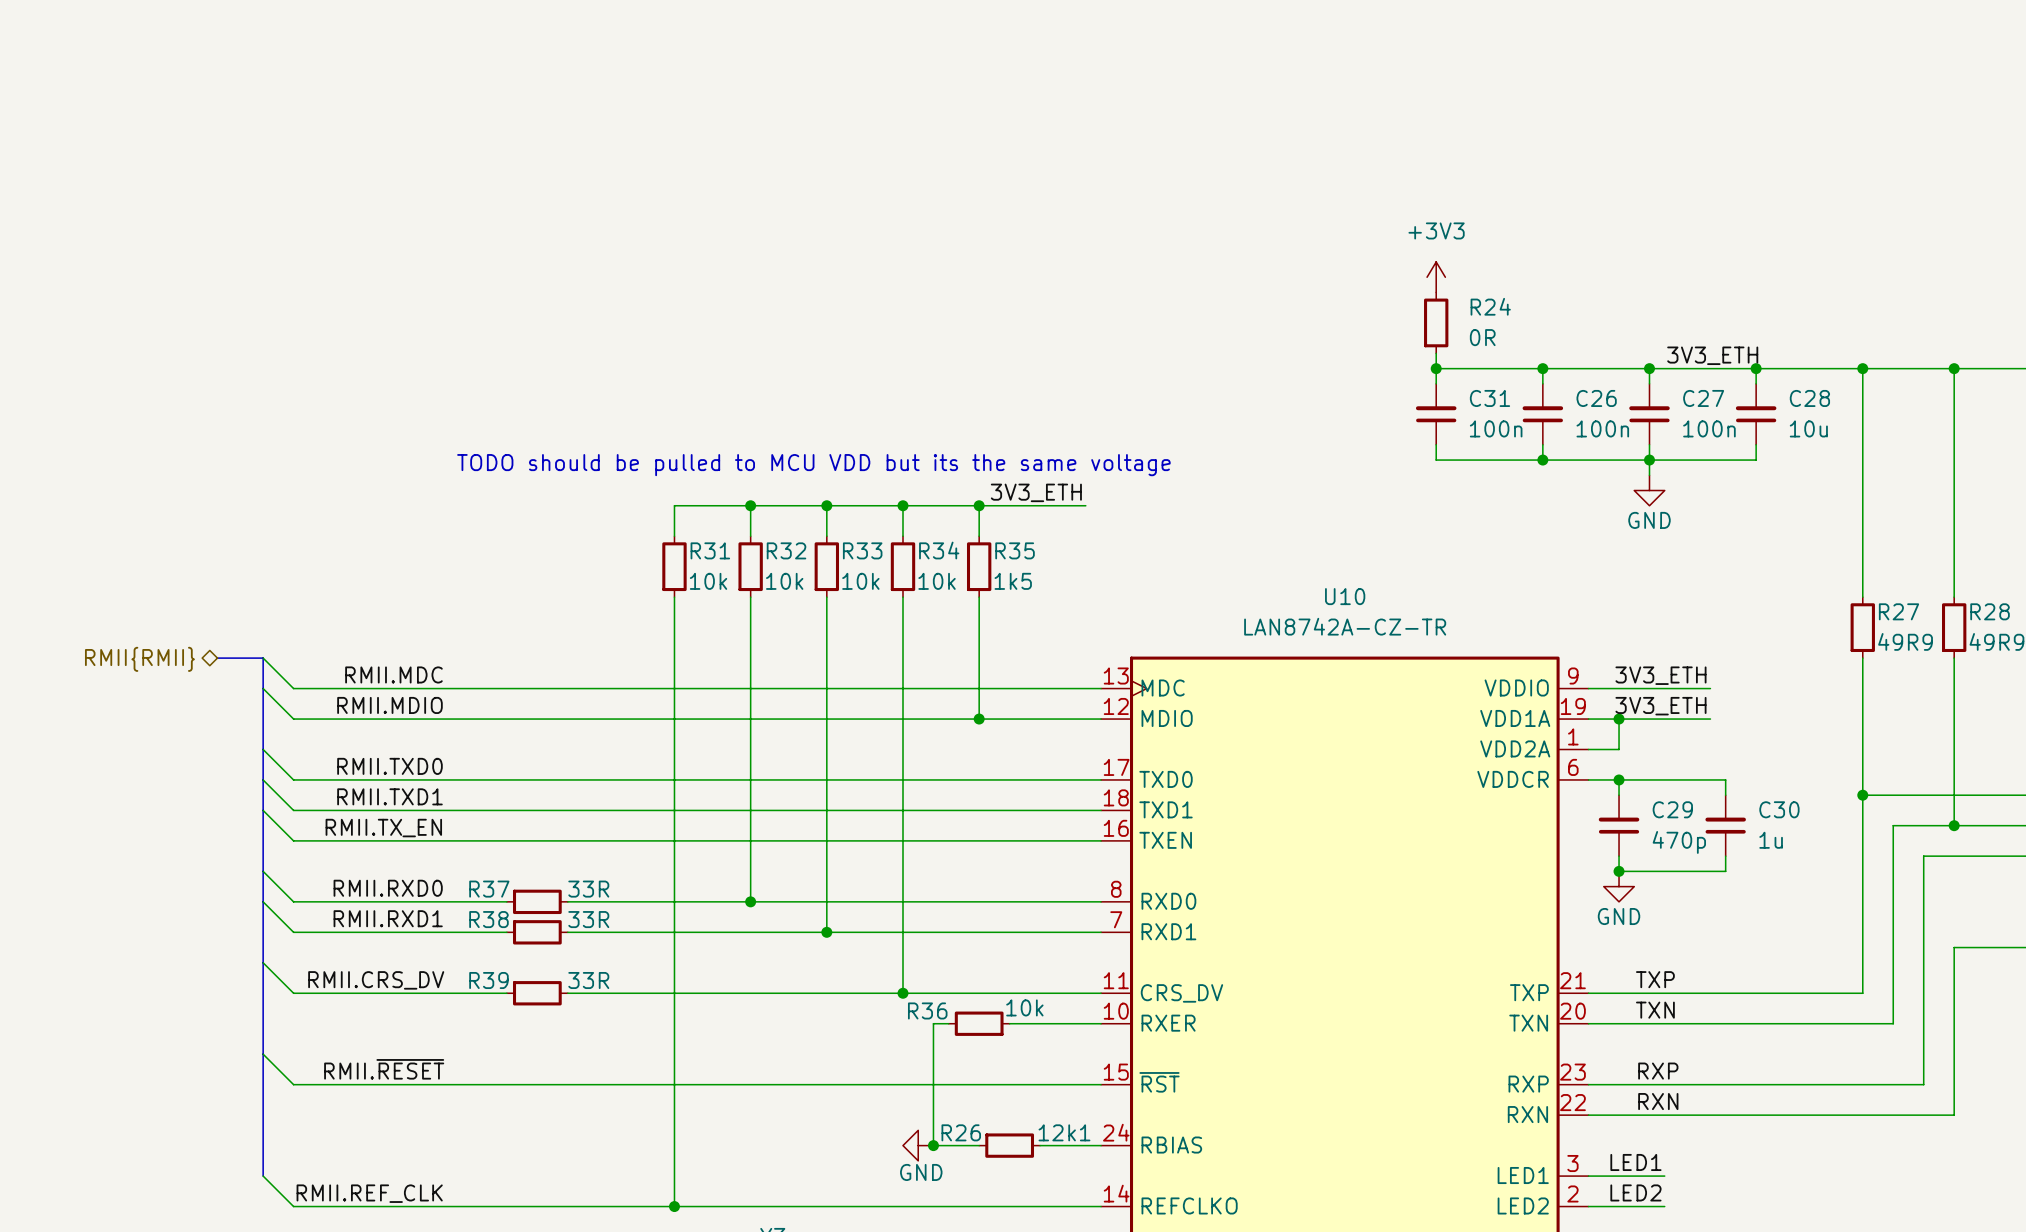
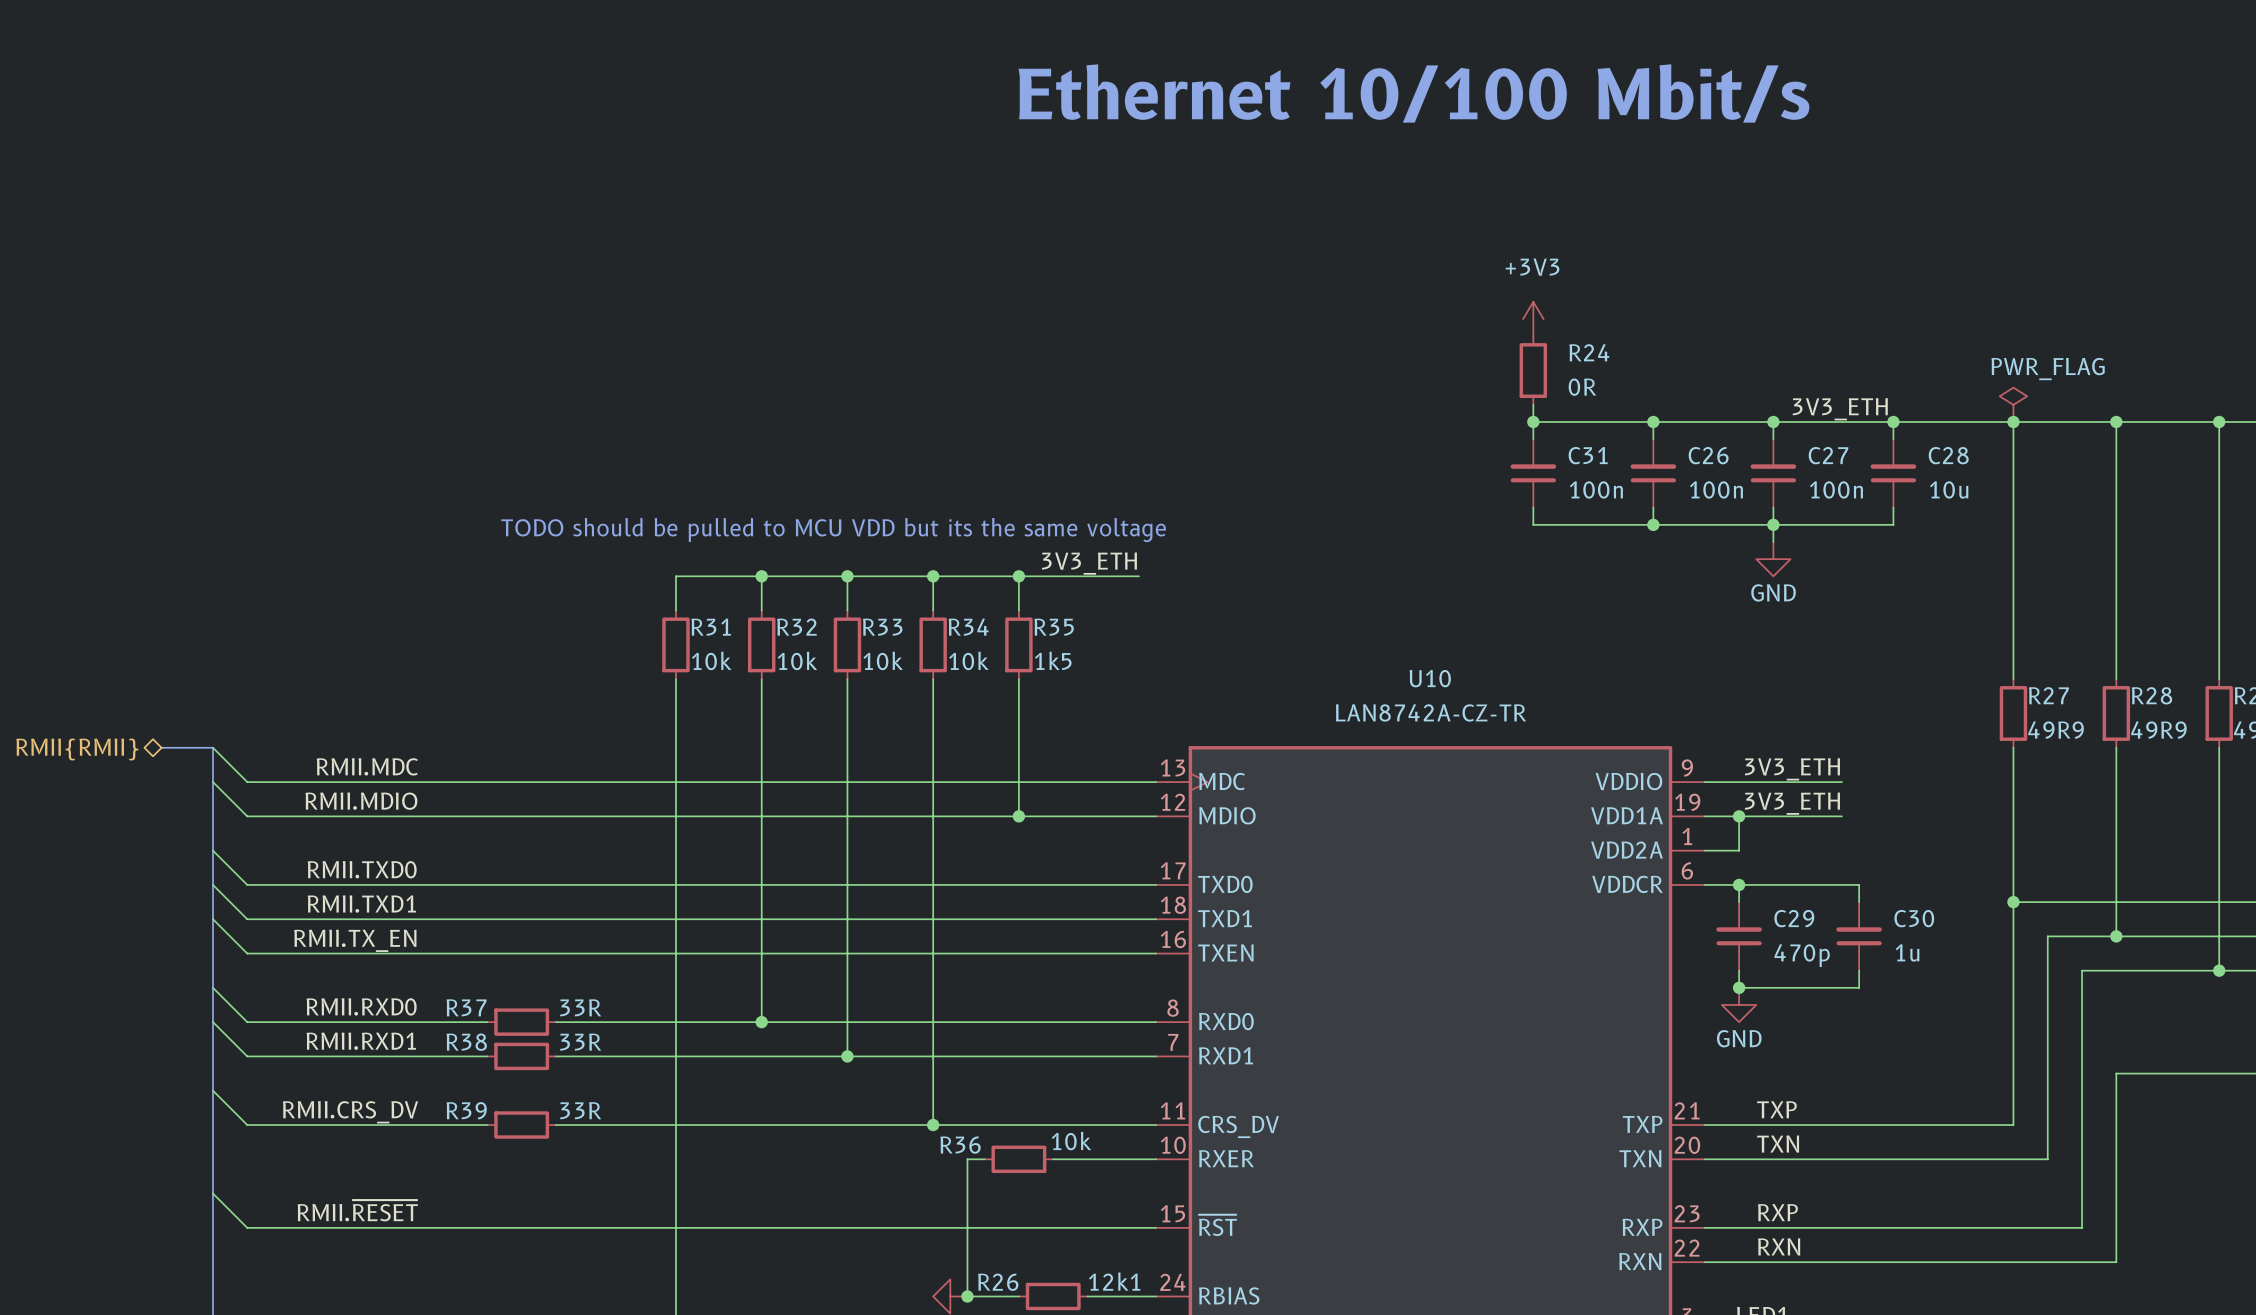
text: none -> Ethernet 10/100 Mbit/s (1413, 93)
power symbol: none -> PWR_FLAG (2013, 404)

